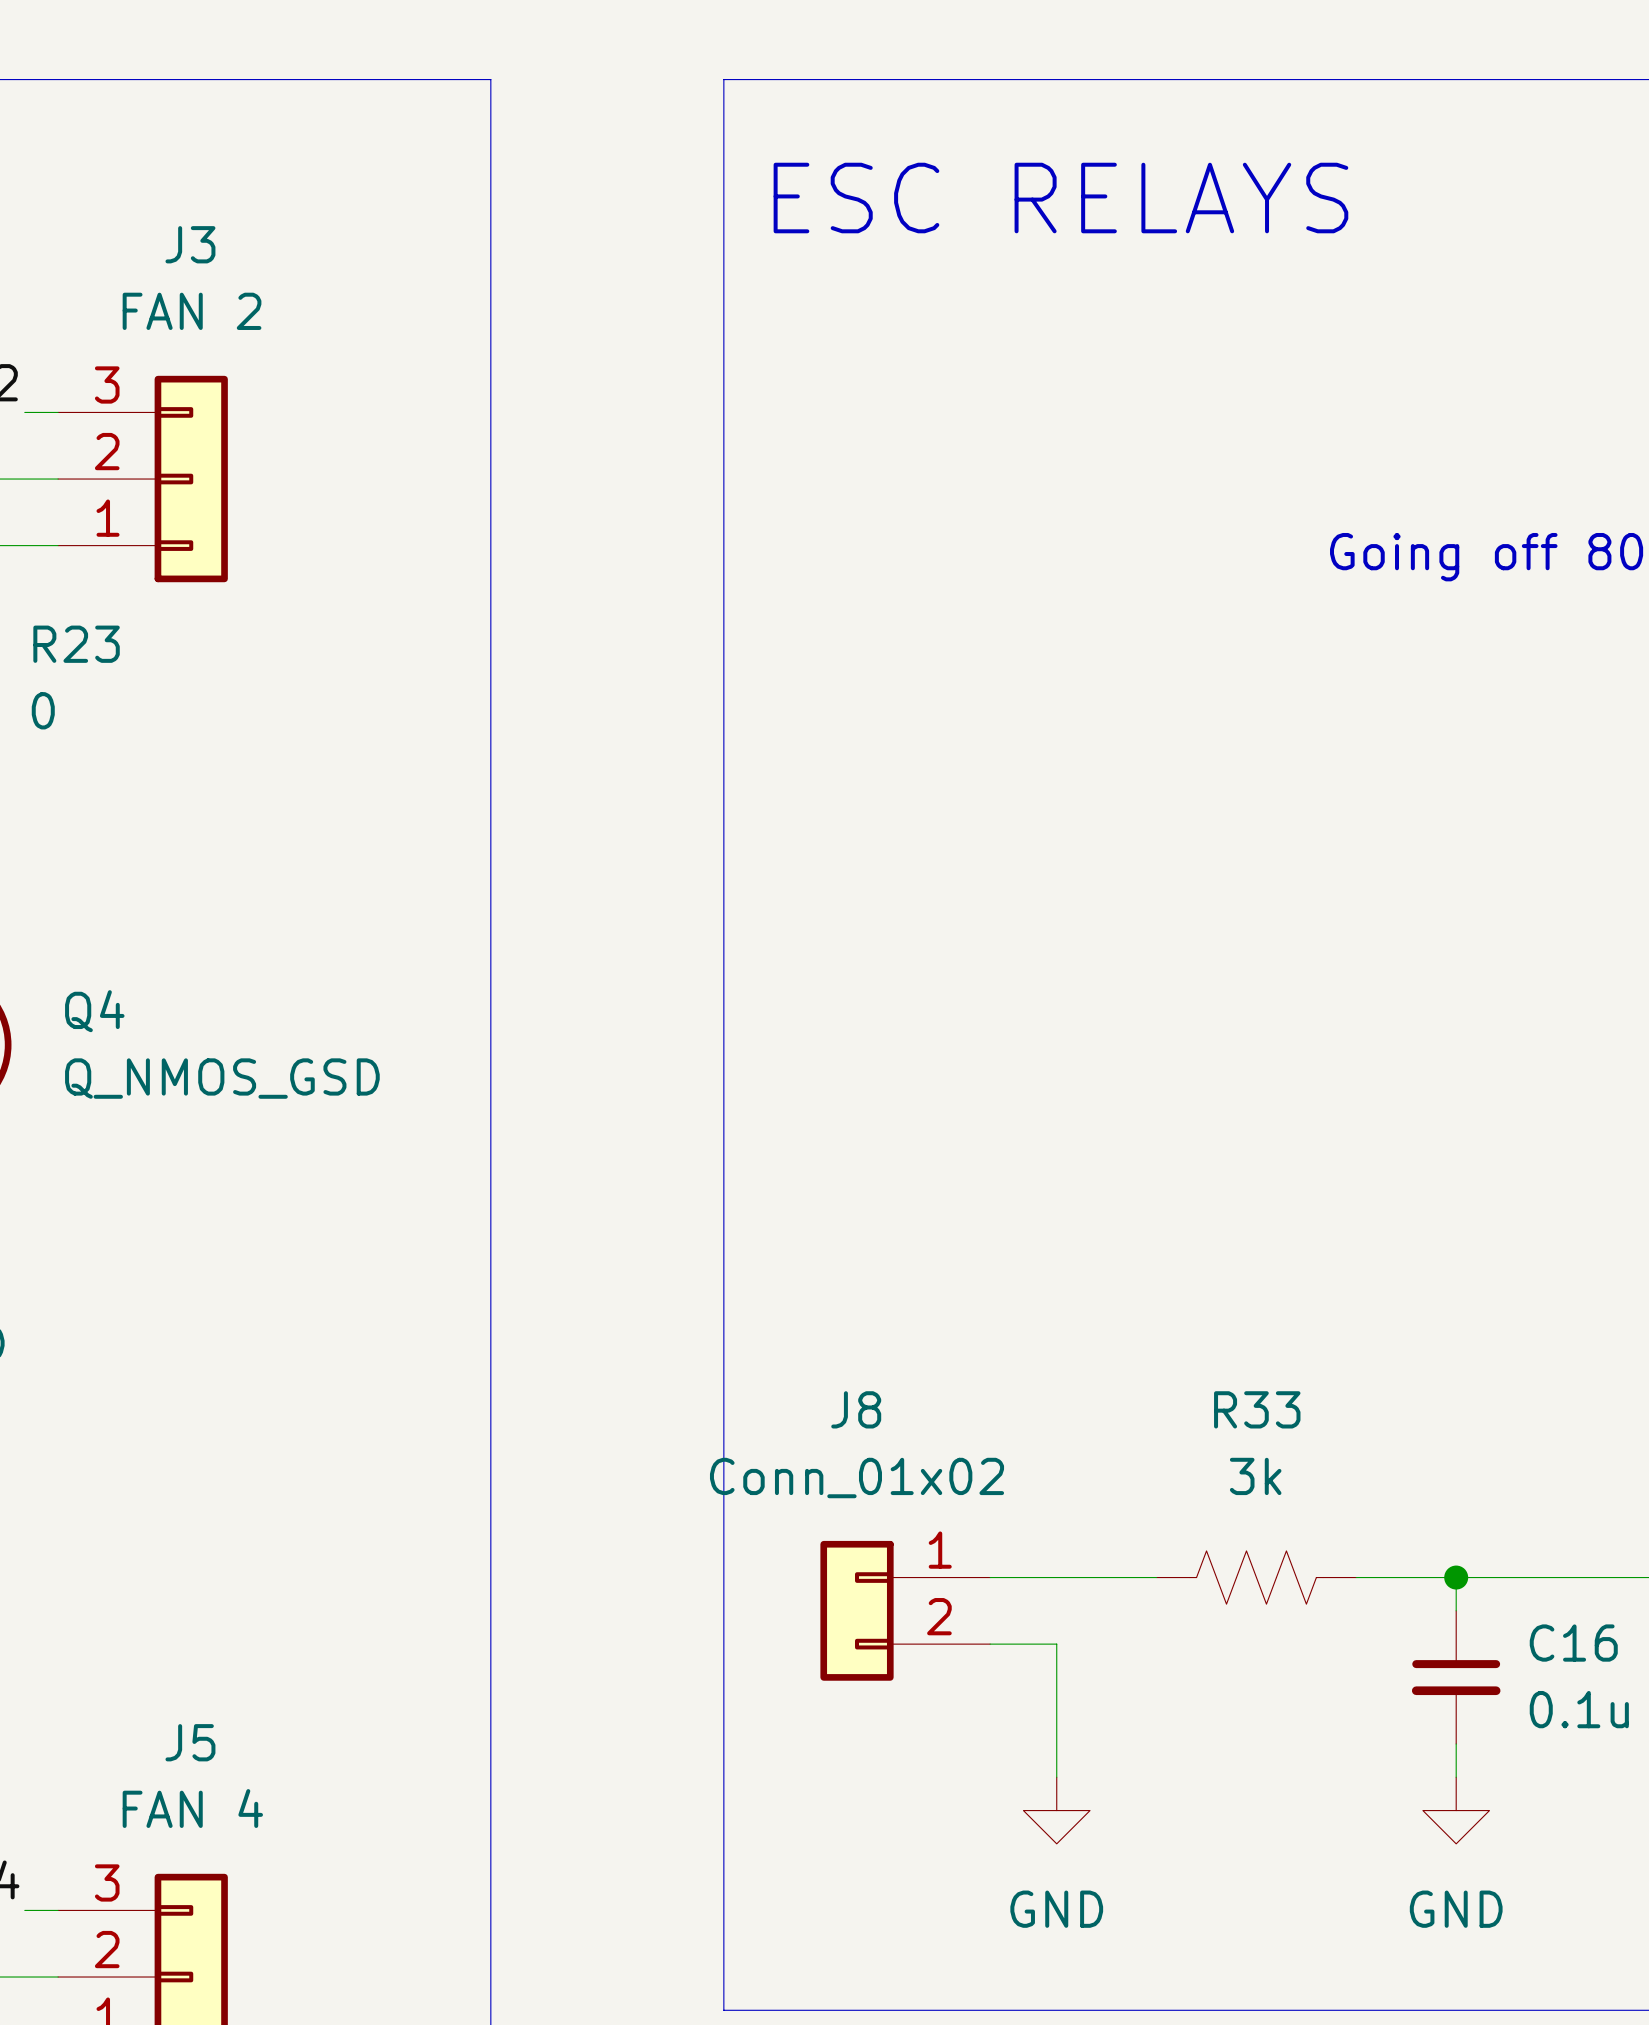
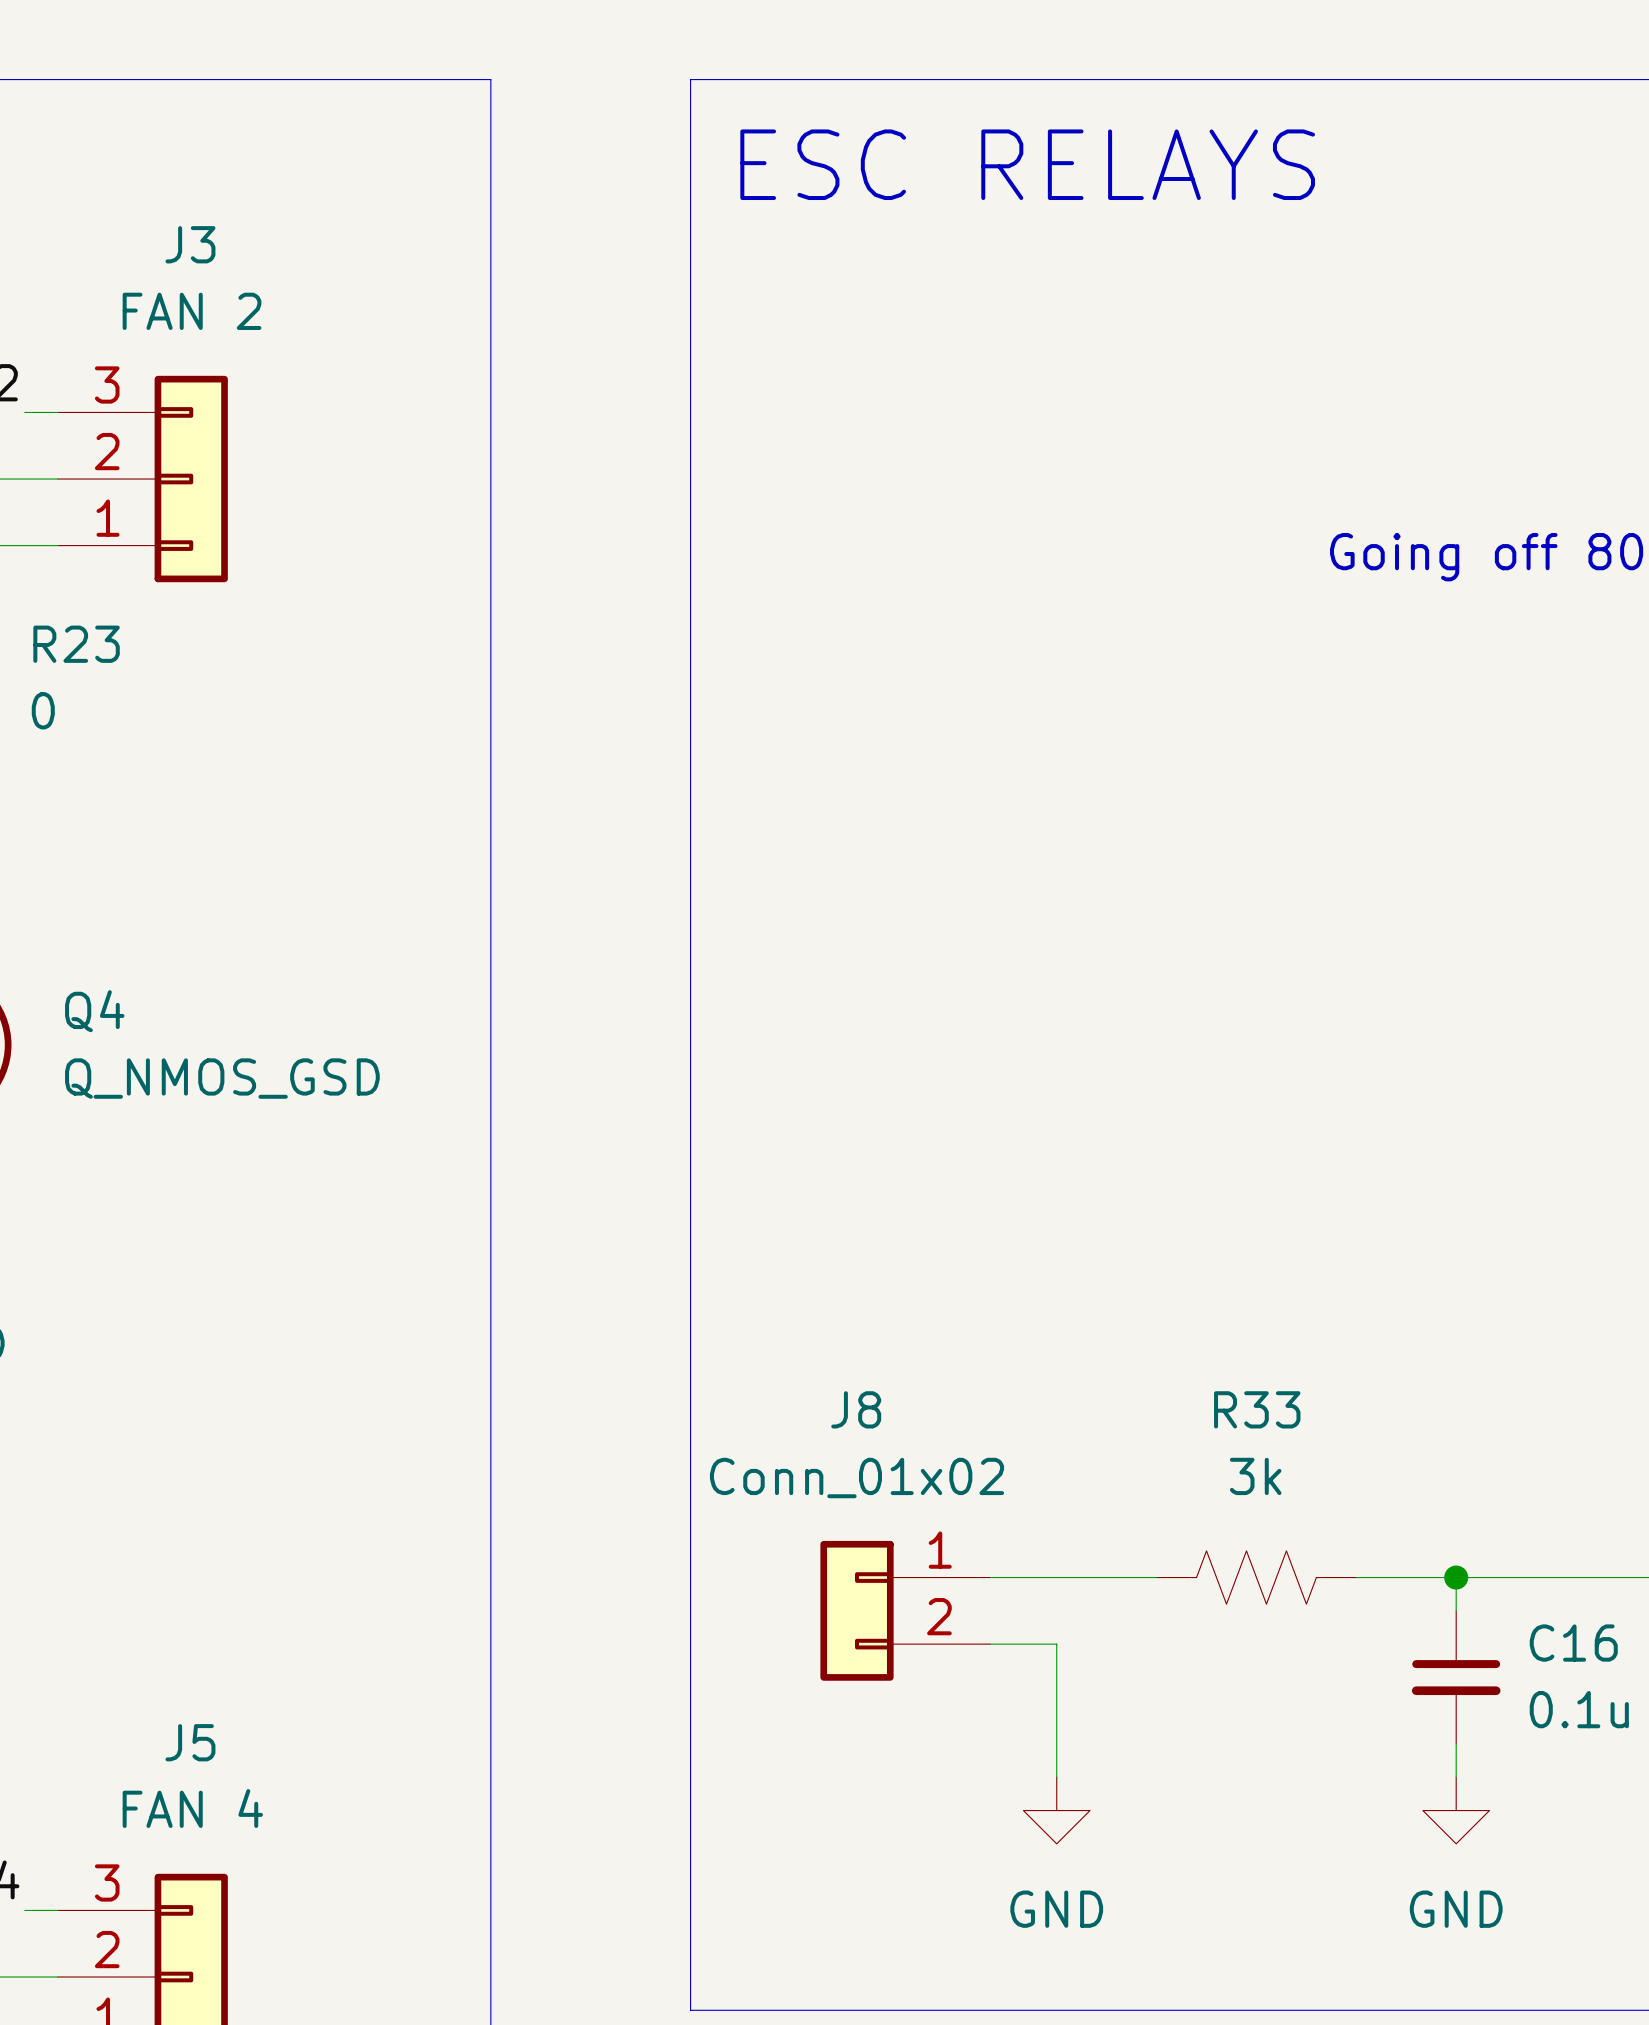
line: (723, 79) (723, 2010) -> (723, 79) (690, 79) (690, 2010) (723, 2010)
text position: ESC RELAYS (1060, 198) -> ESC RELAYS (1027, 164)

